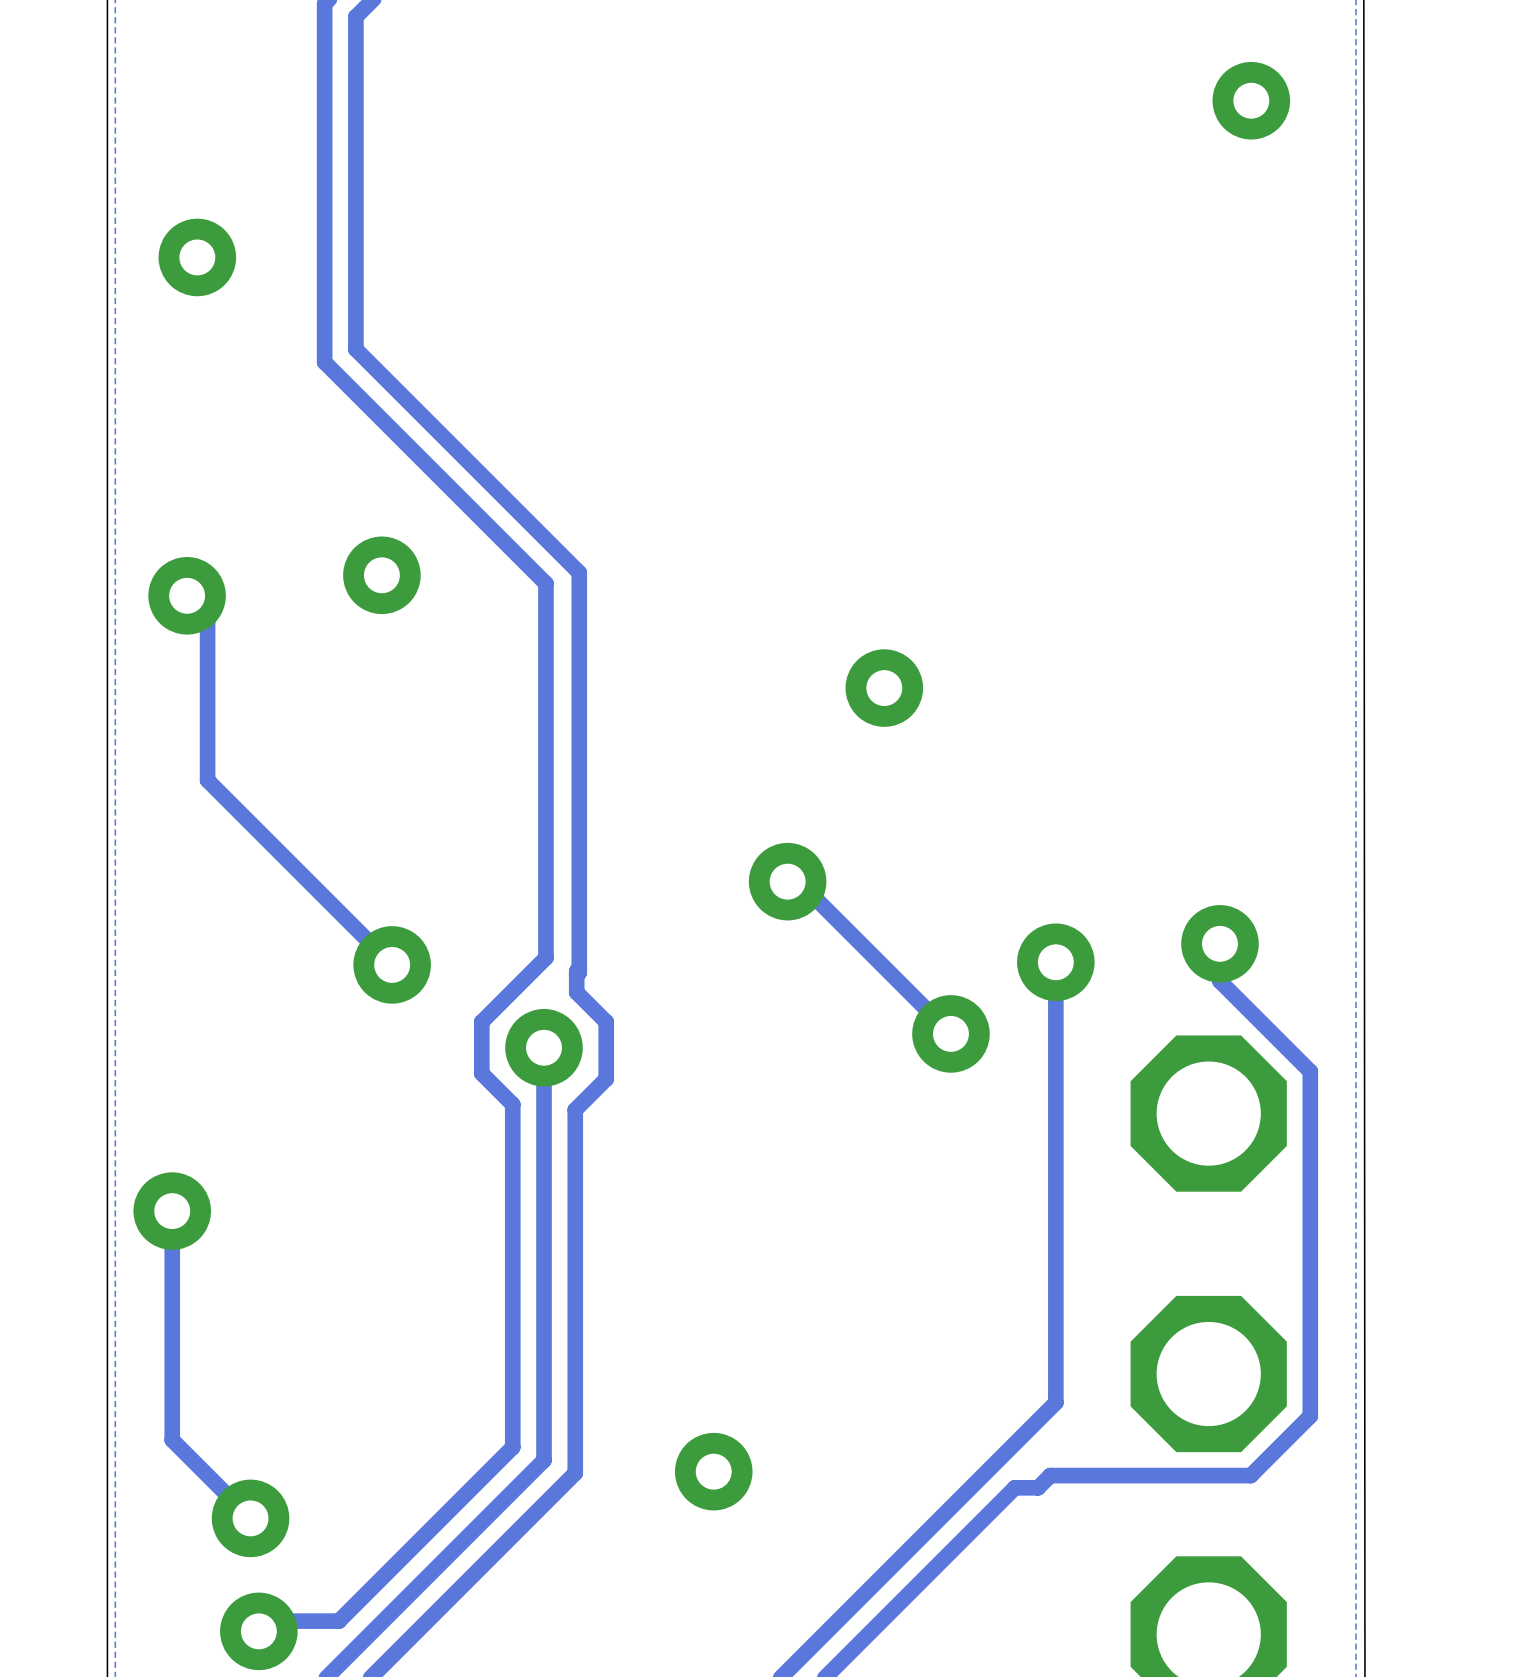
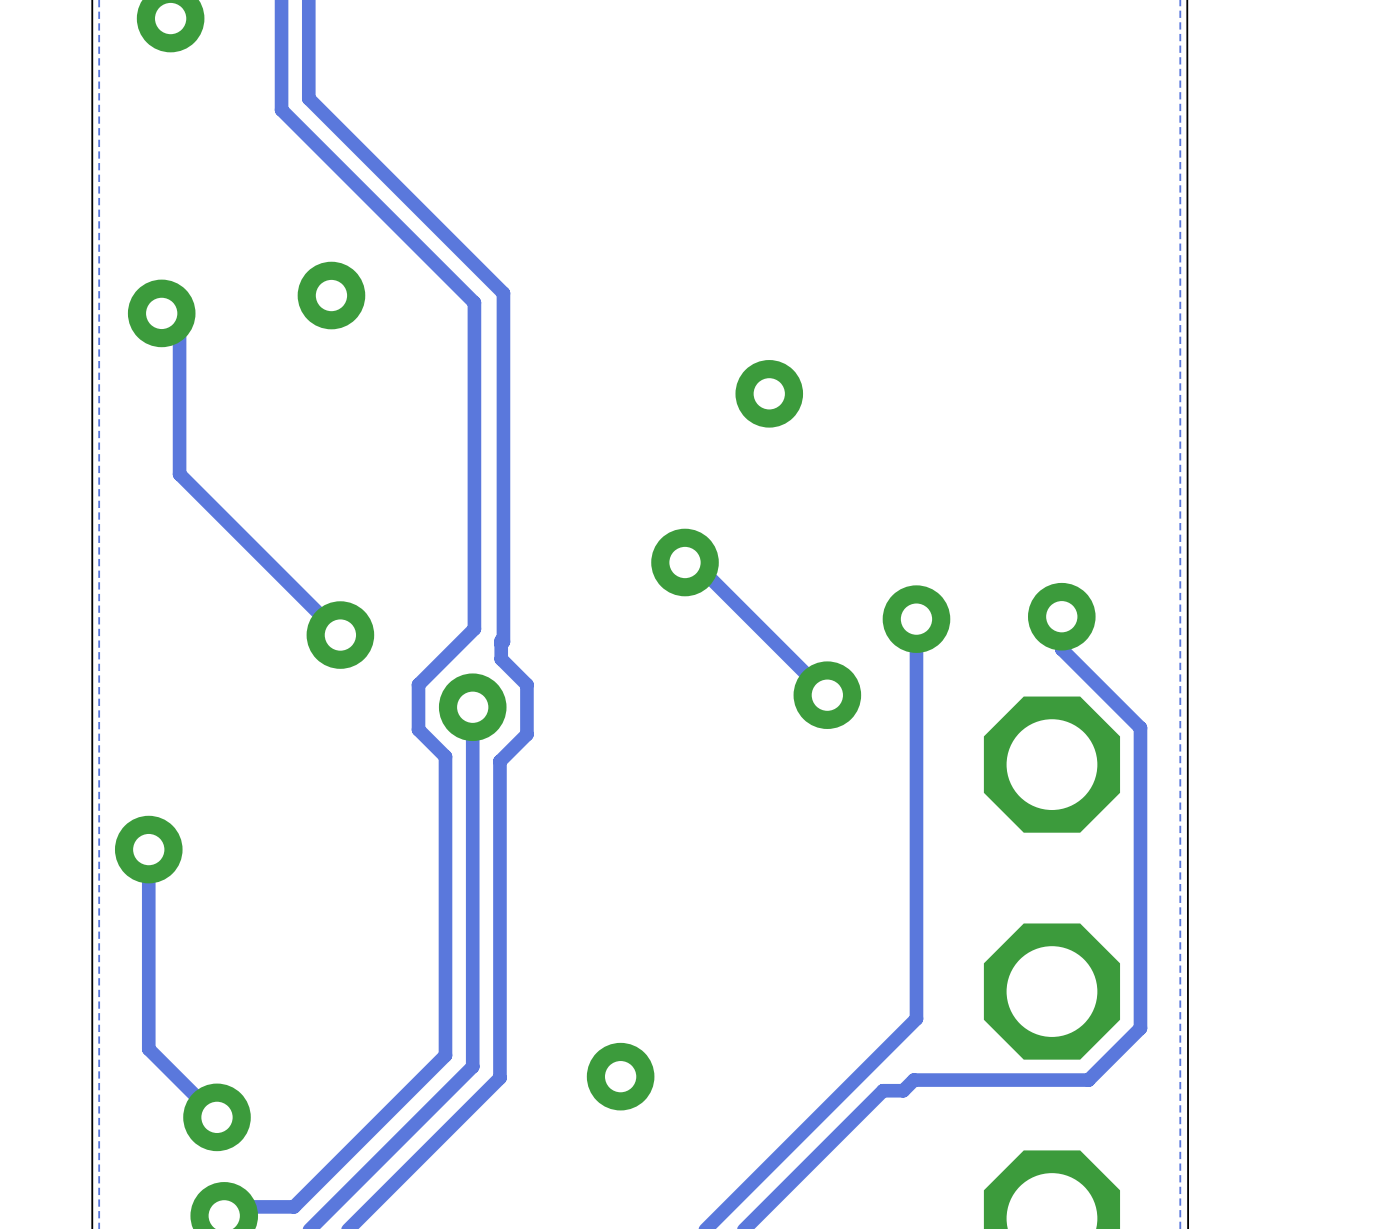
track: (1055, 962) (1055, 1402) (1053, 1405) -> (916, 619) (916, 1018)
via position: (1055, 962) -> (916, 619)

